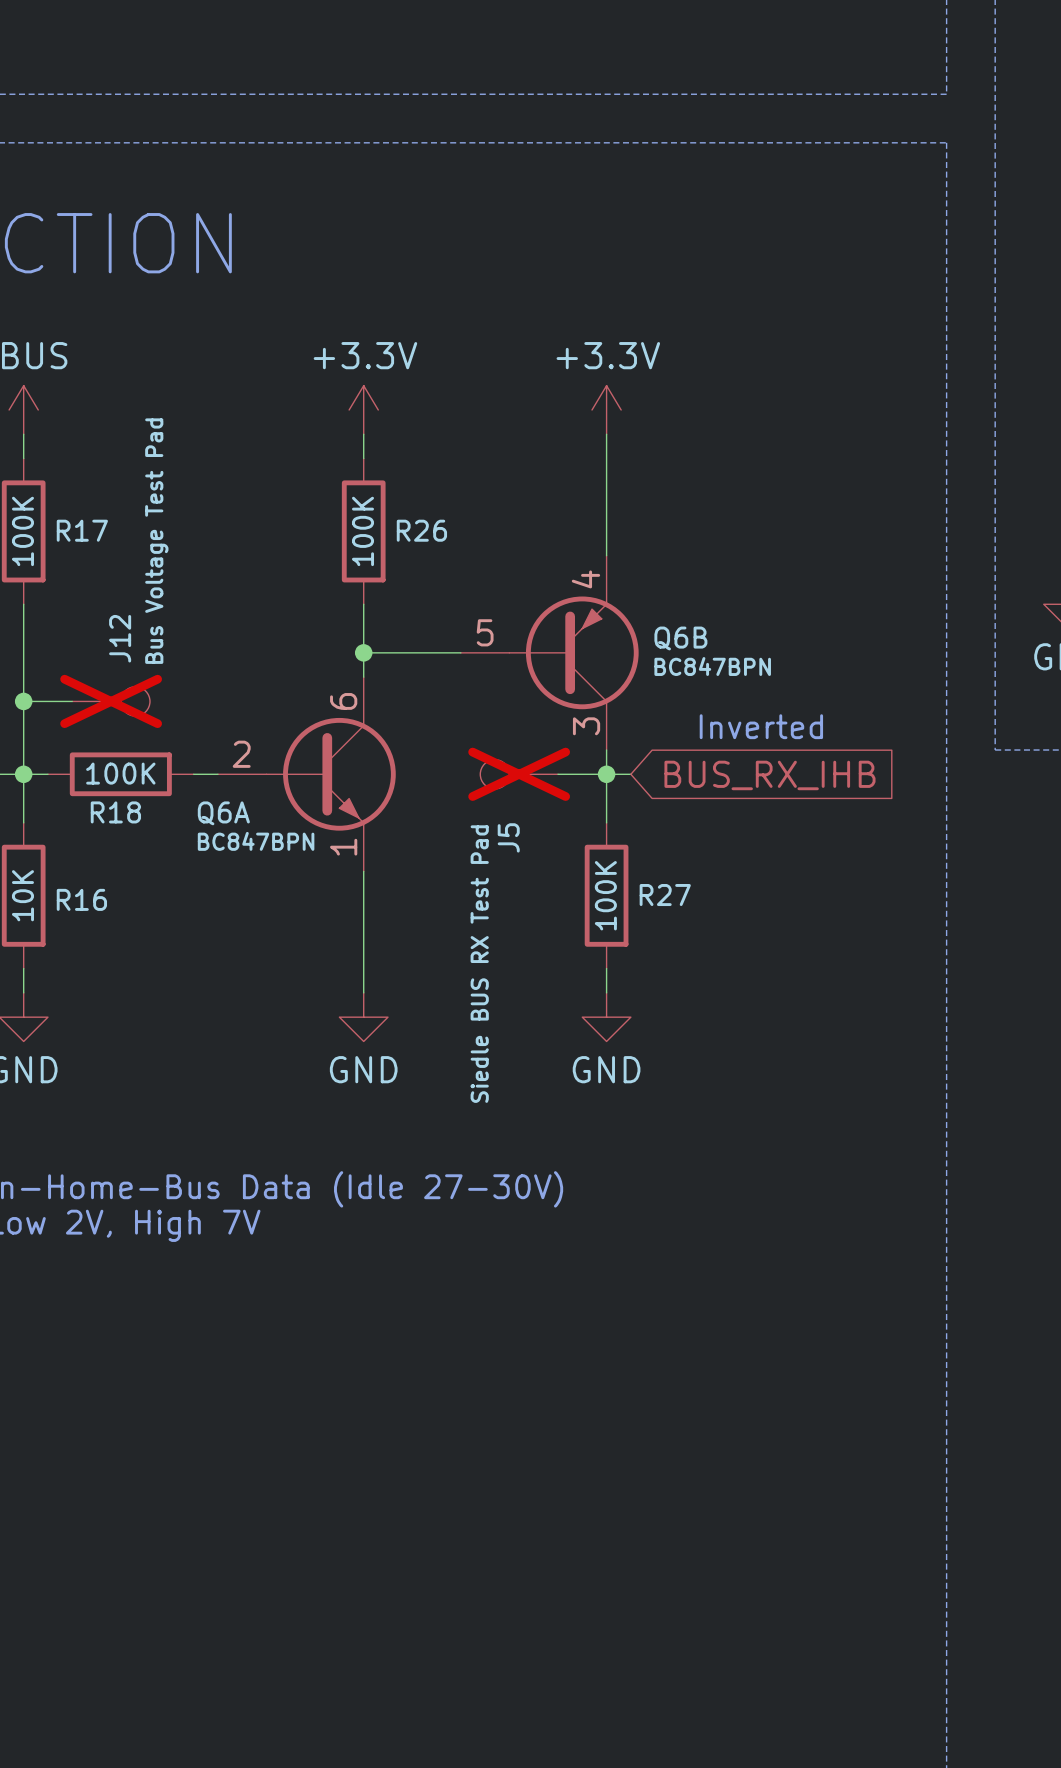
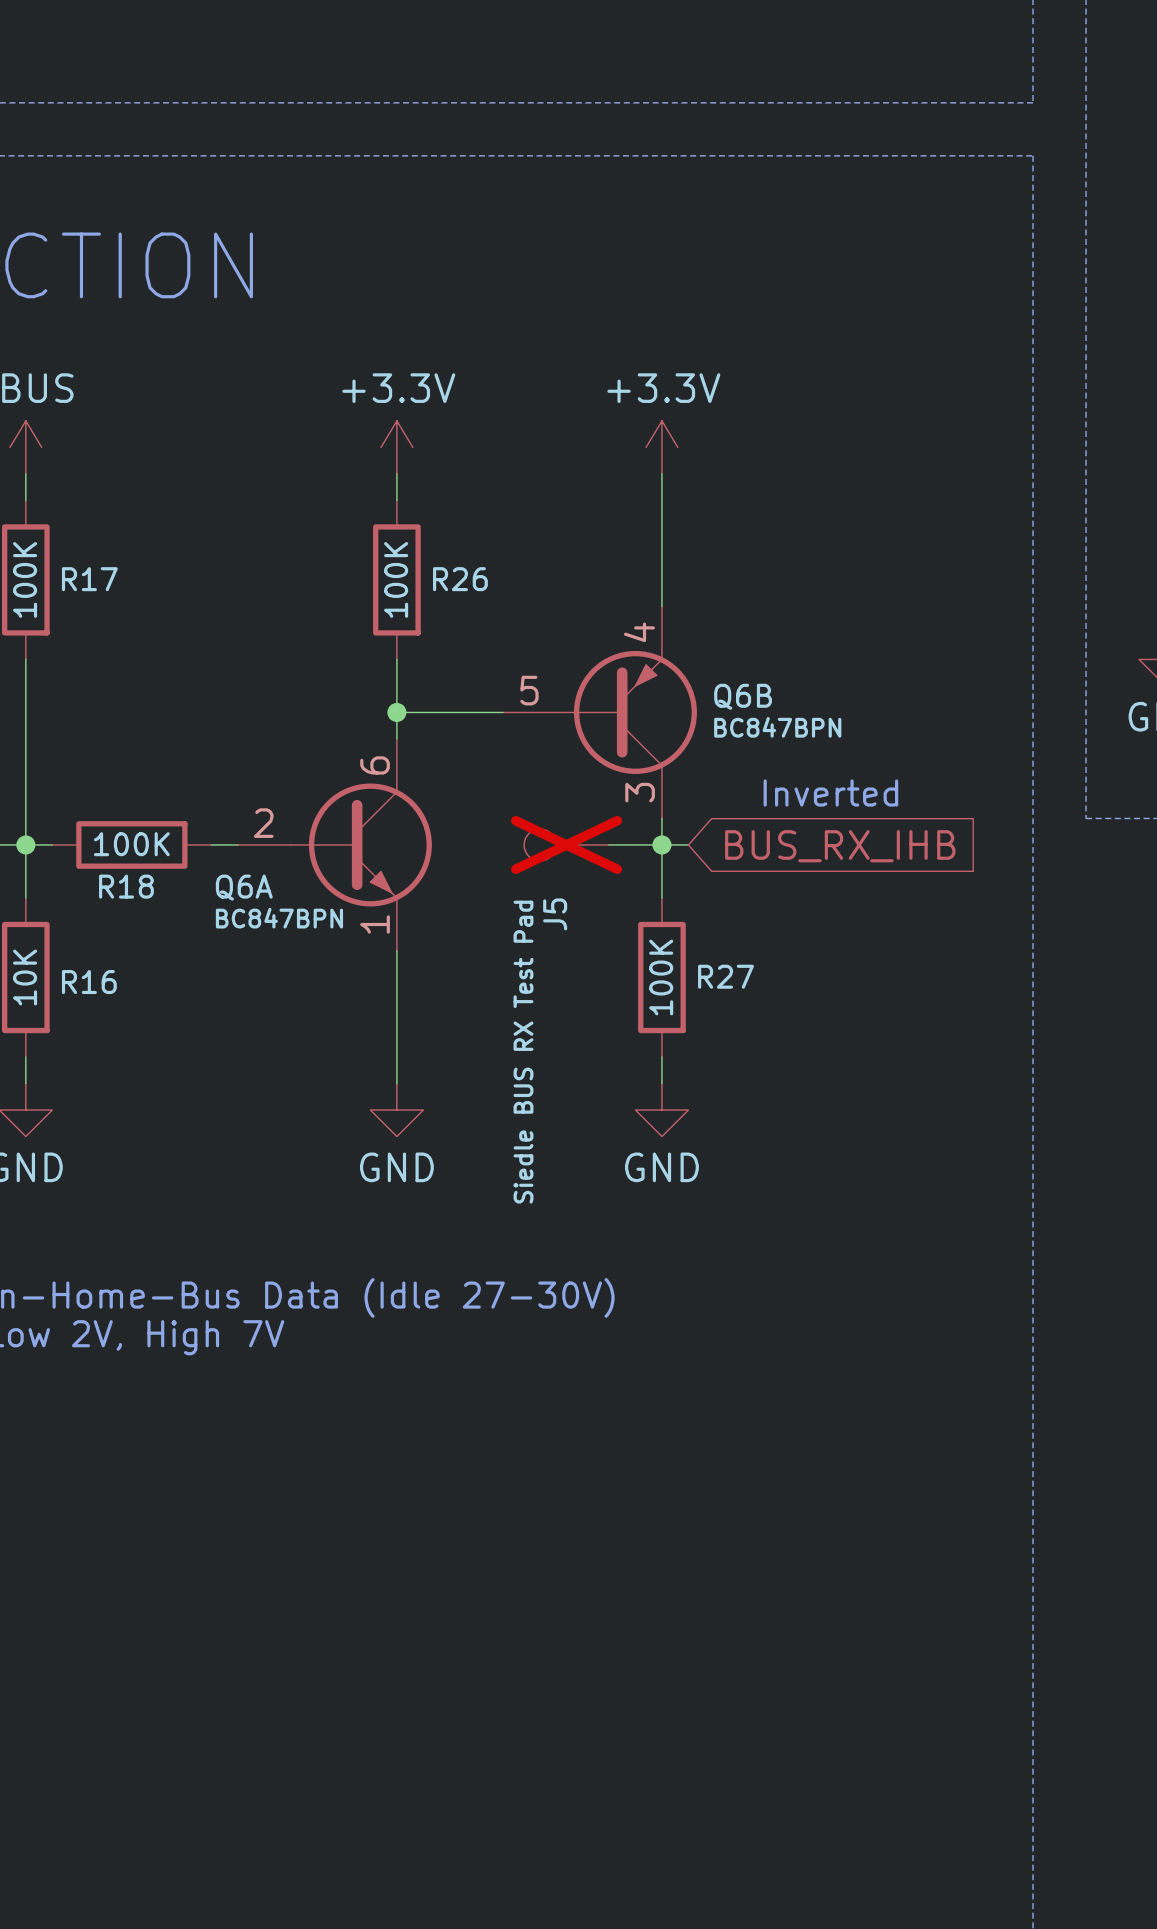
wire: (23, 701) (72, 701) -> none
junction: (23, 701) -> none
J12: Bus Voltage Test Pad (111, 701) -> none

